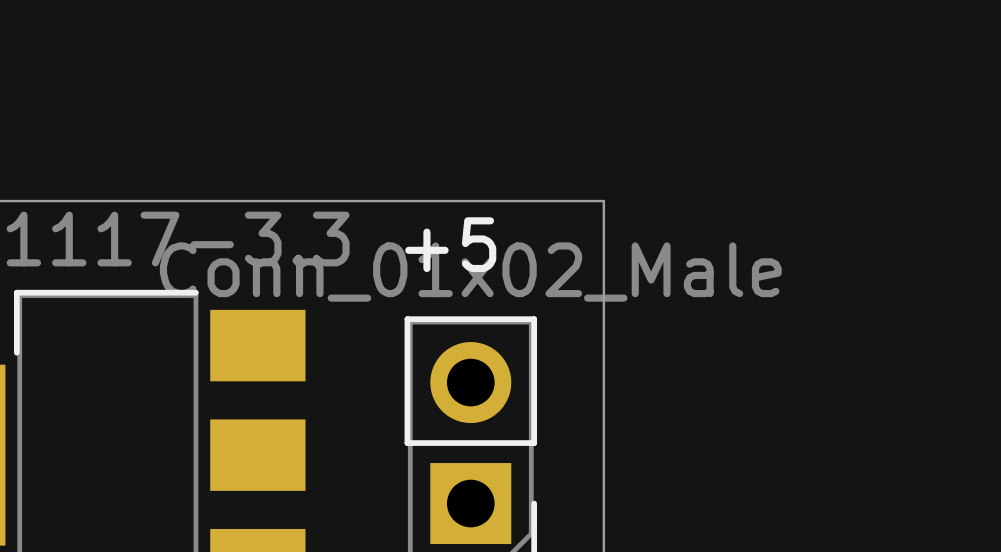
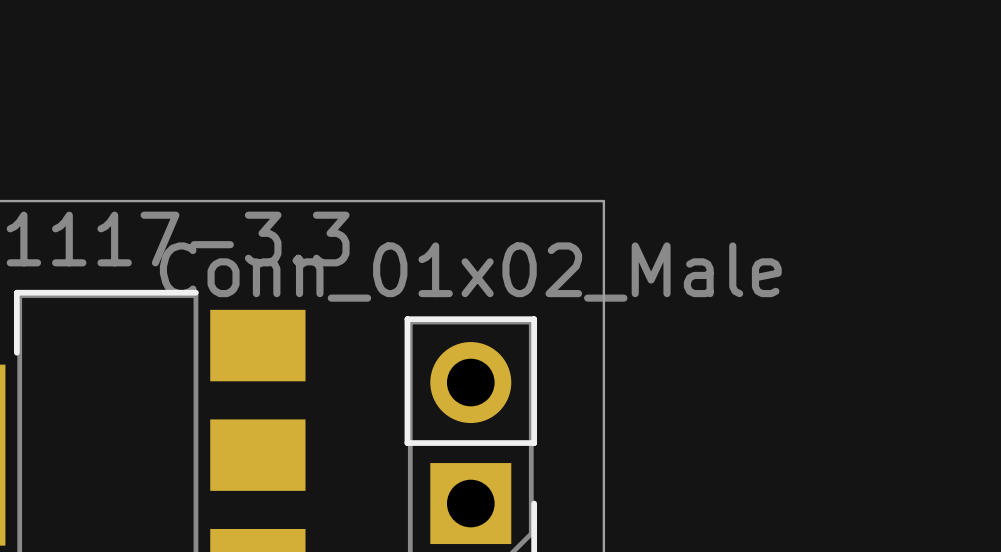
text: +5 (450, 244) -> none

